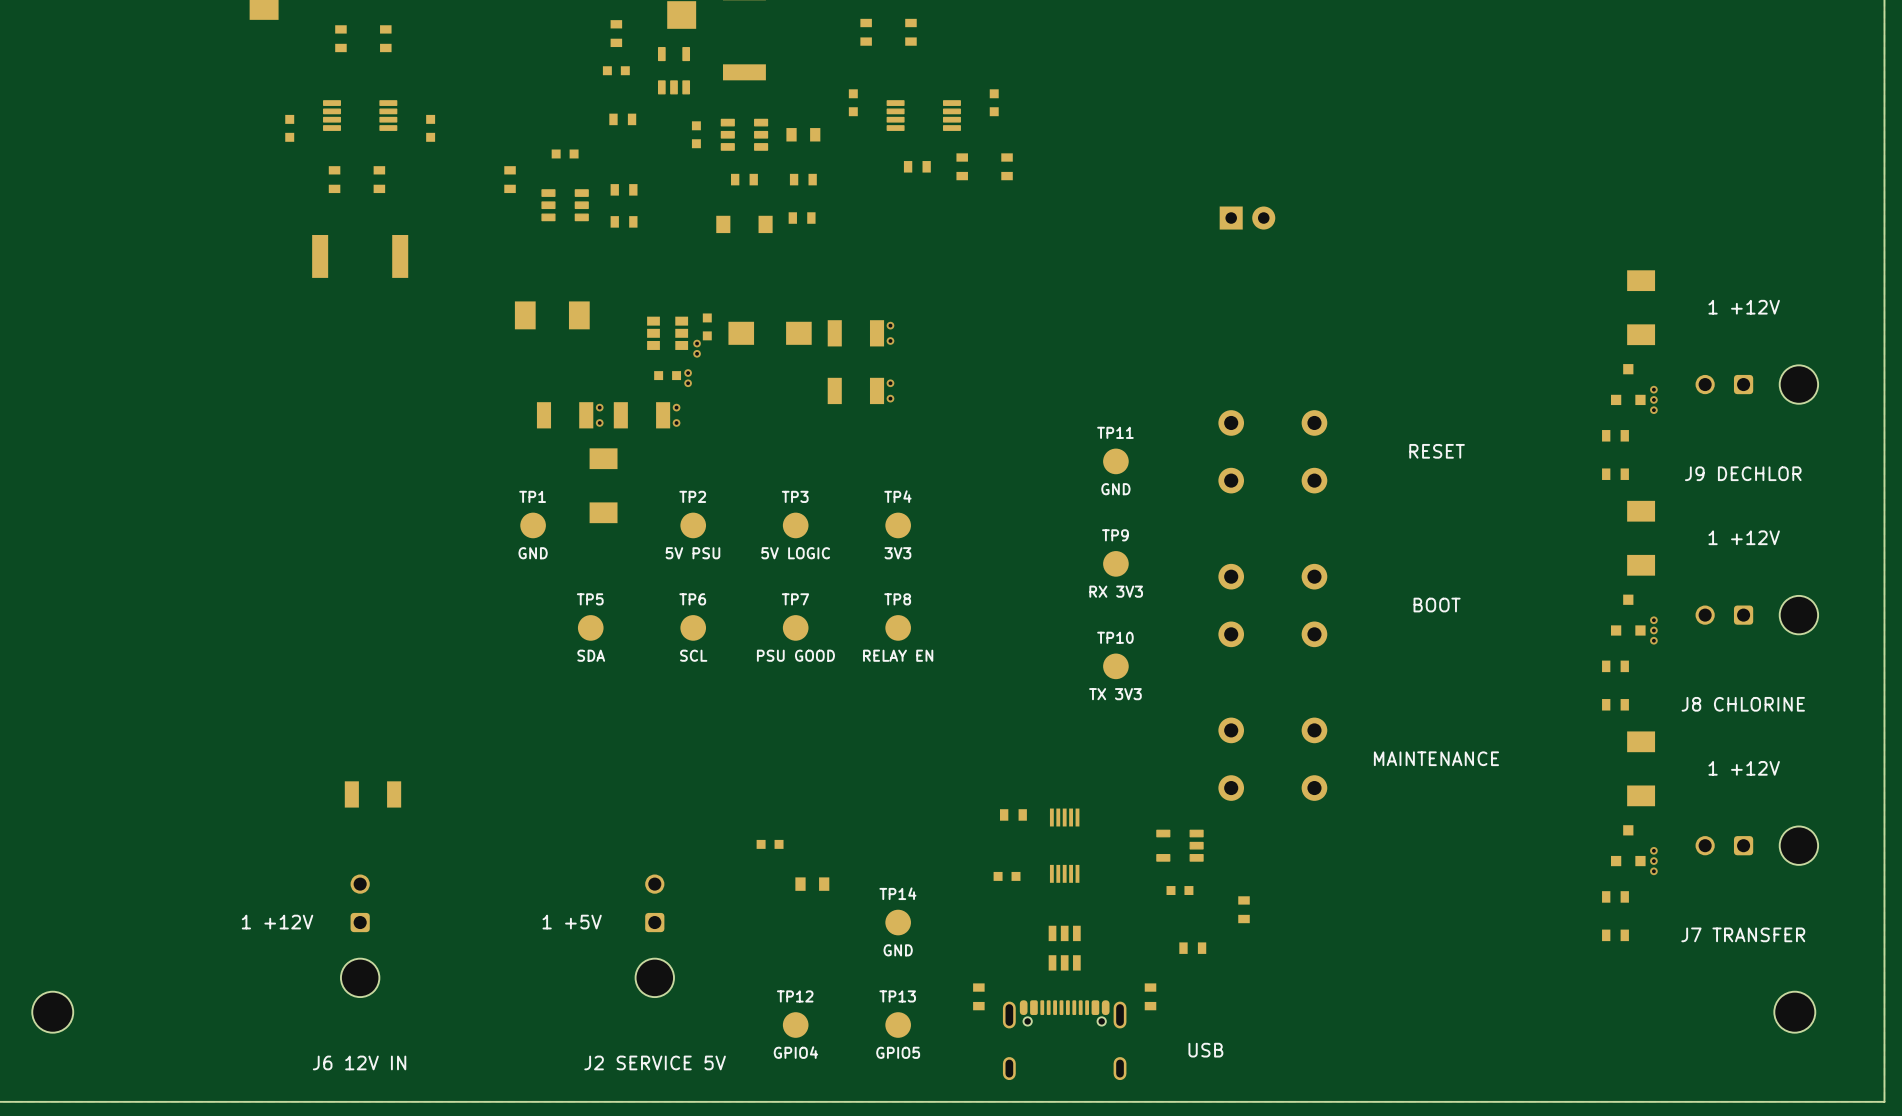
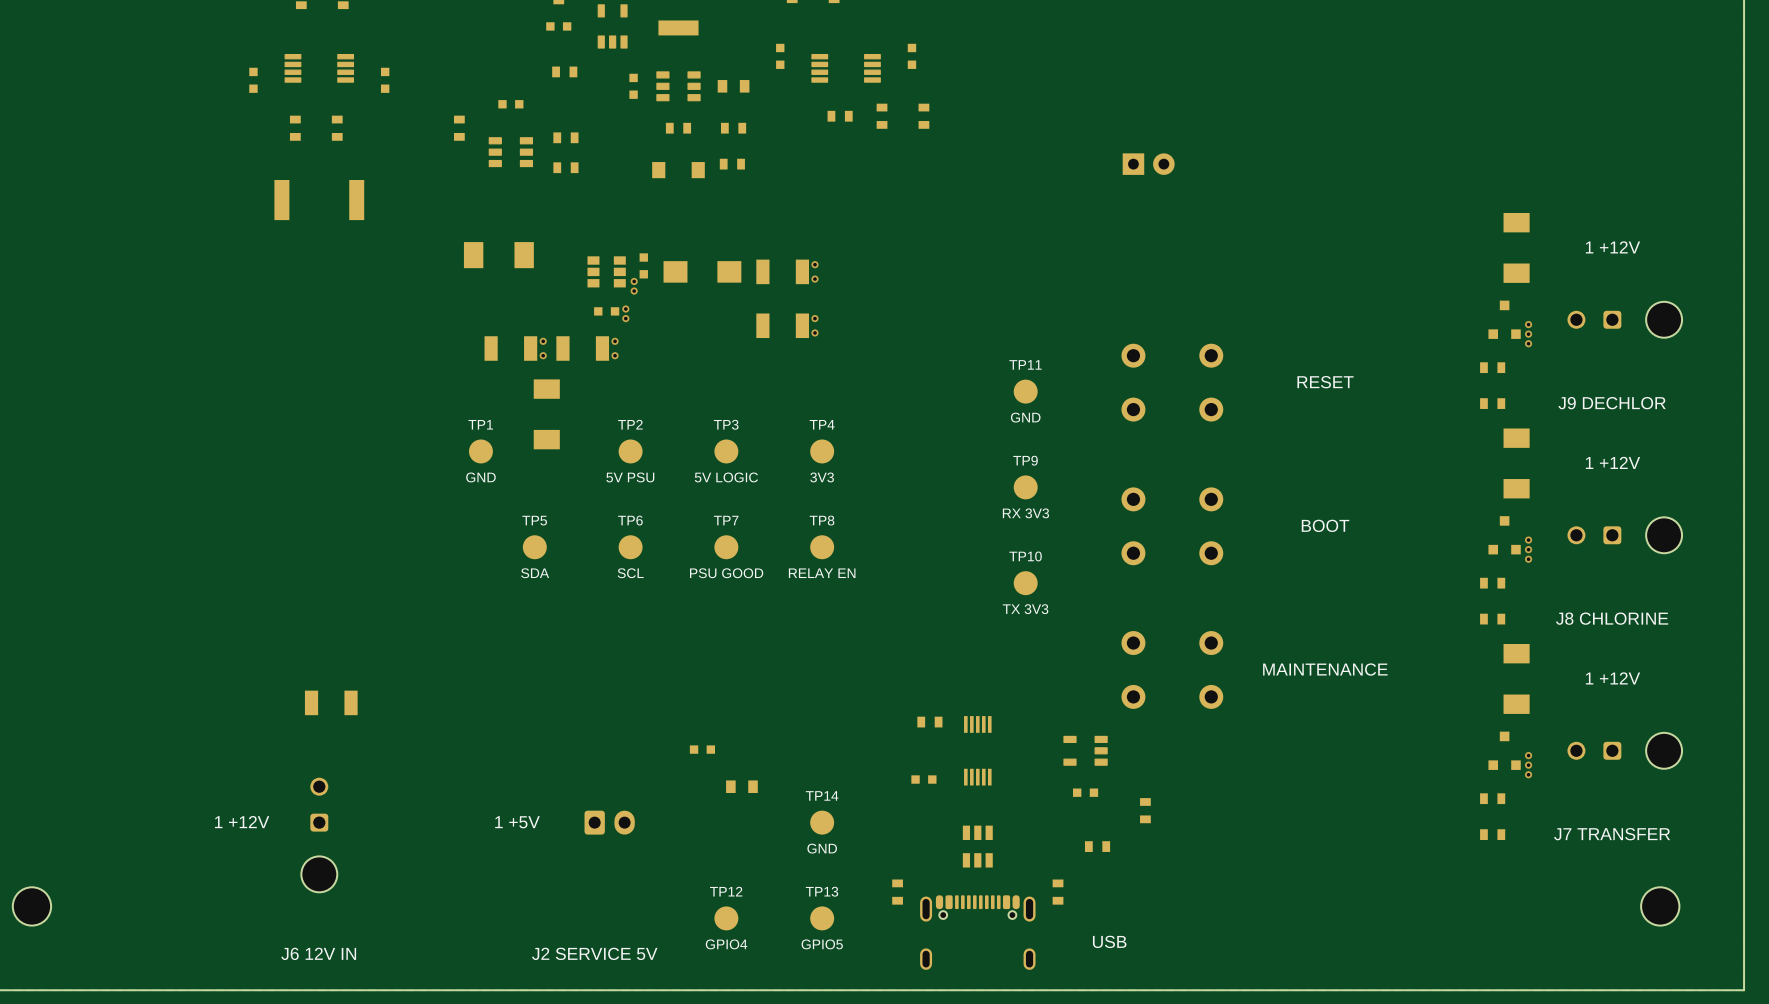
part: none -> (609, 822)
part: (654, 935) -> none

